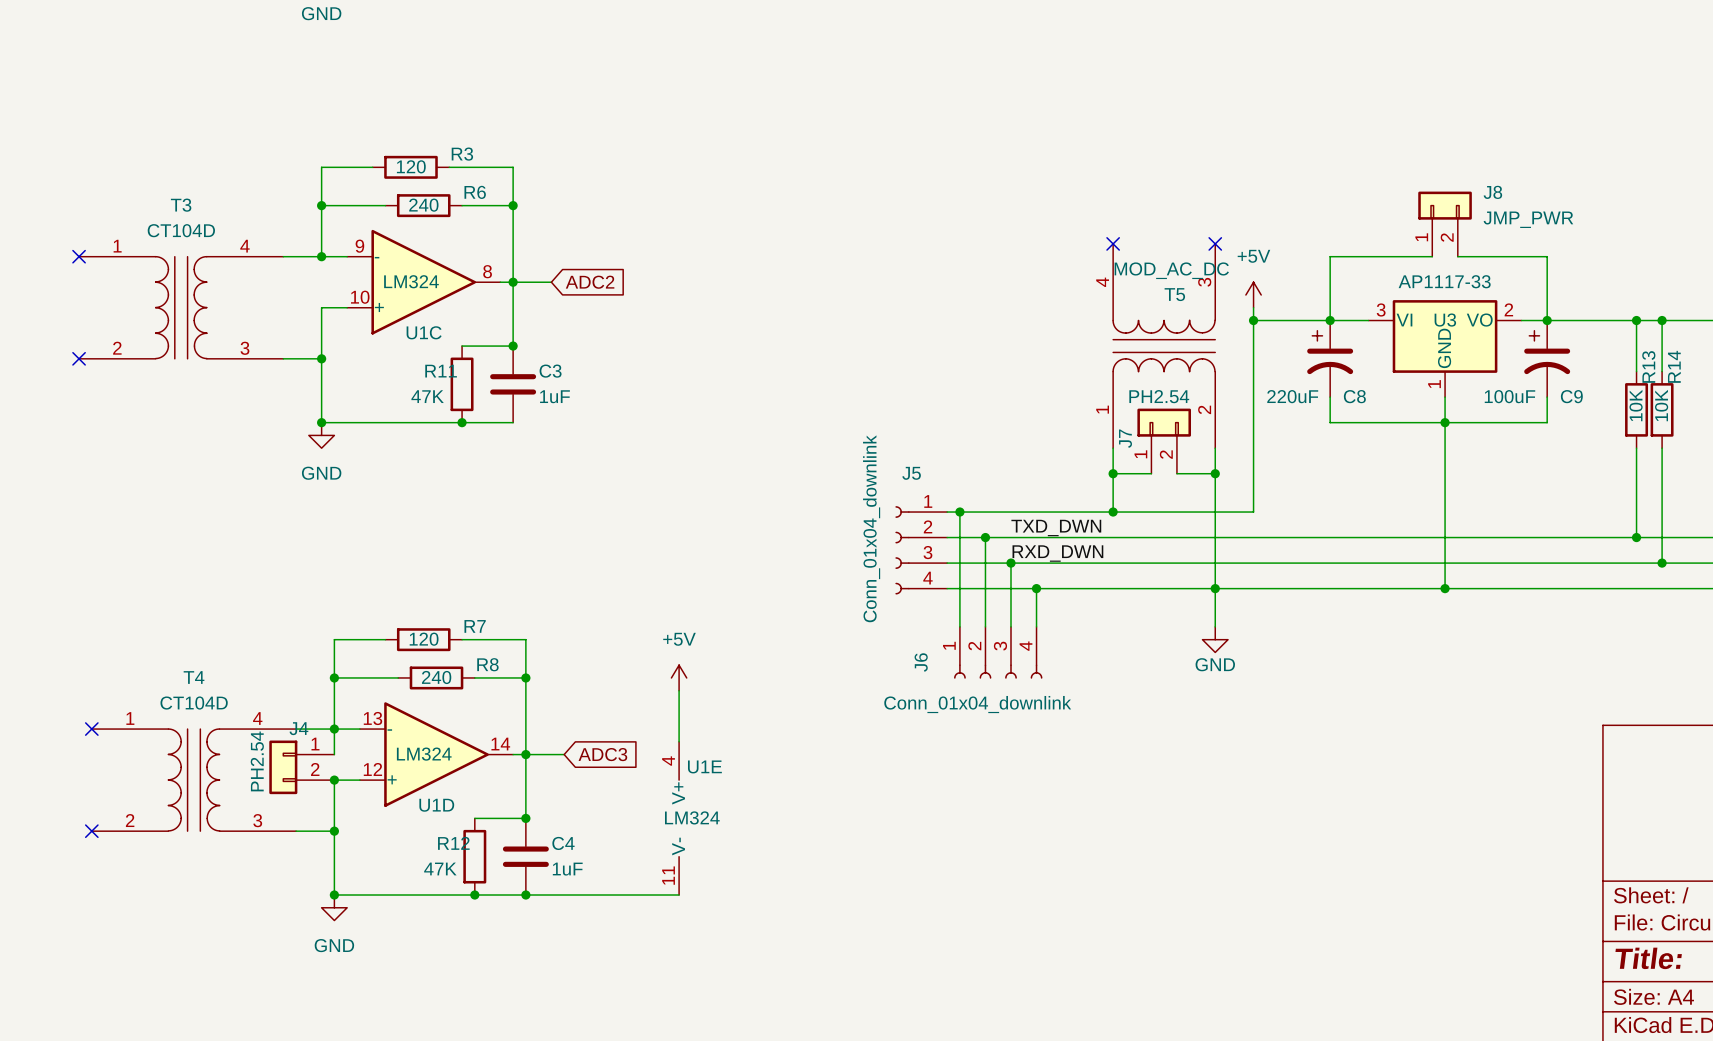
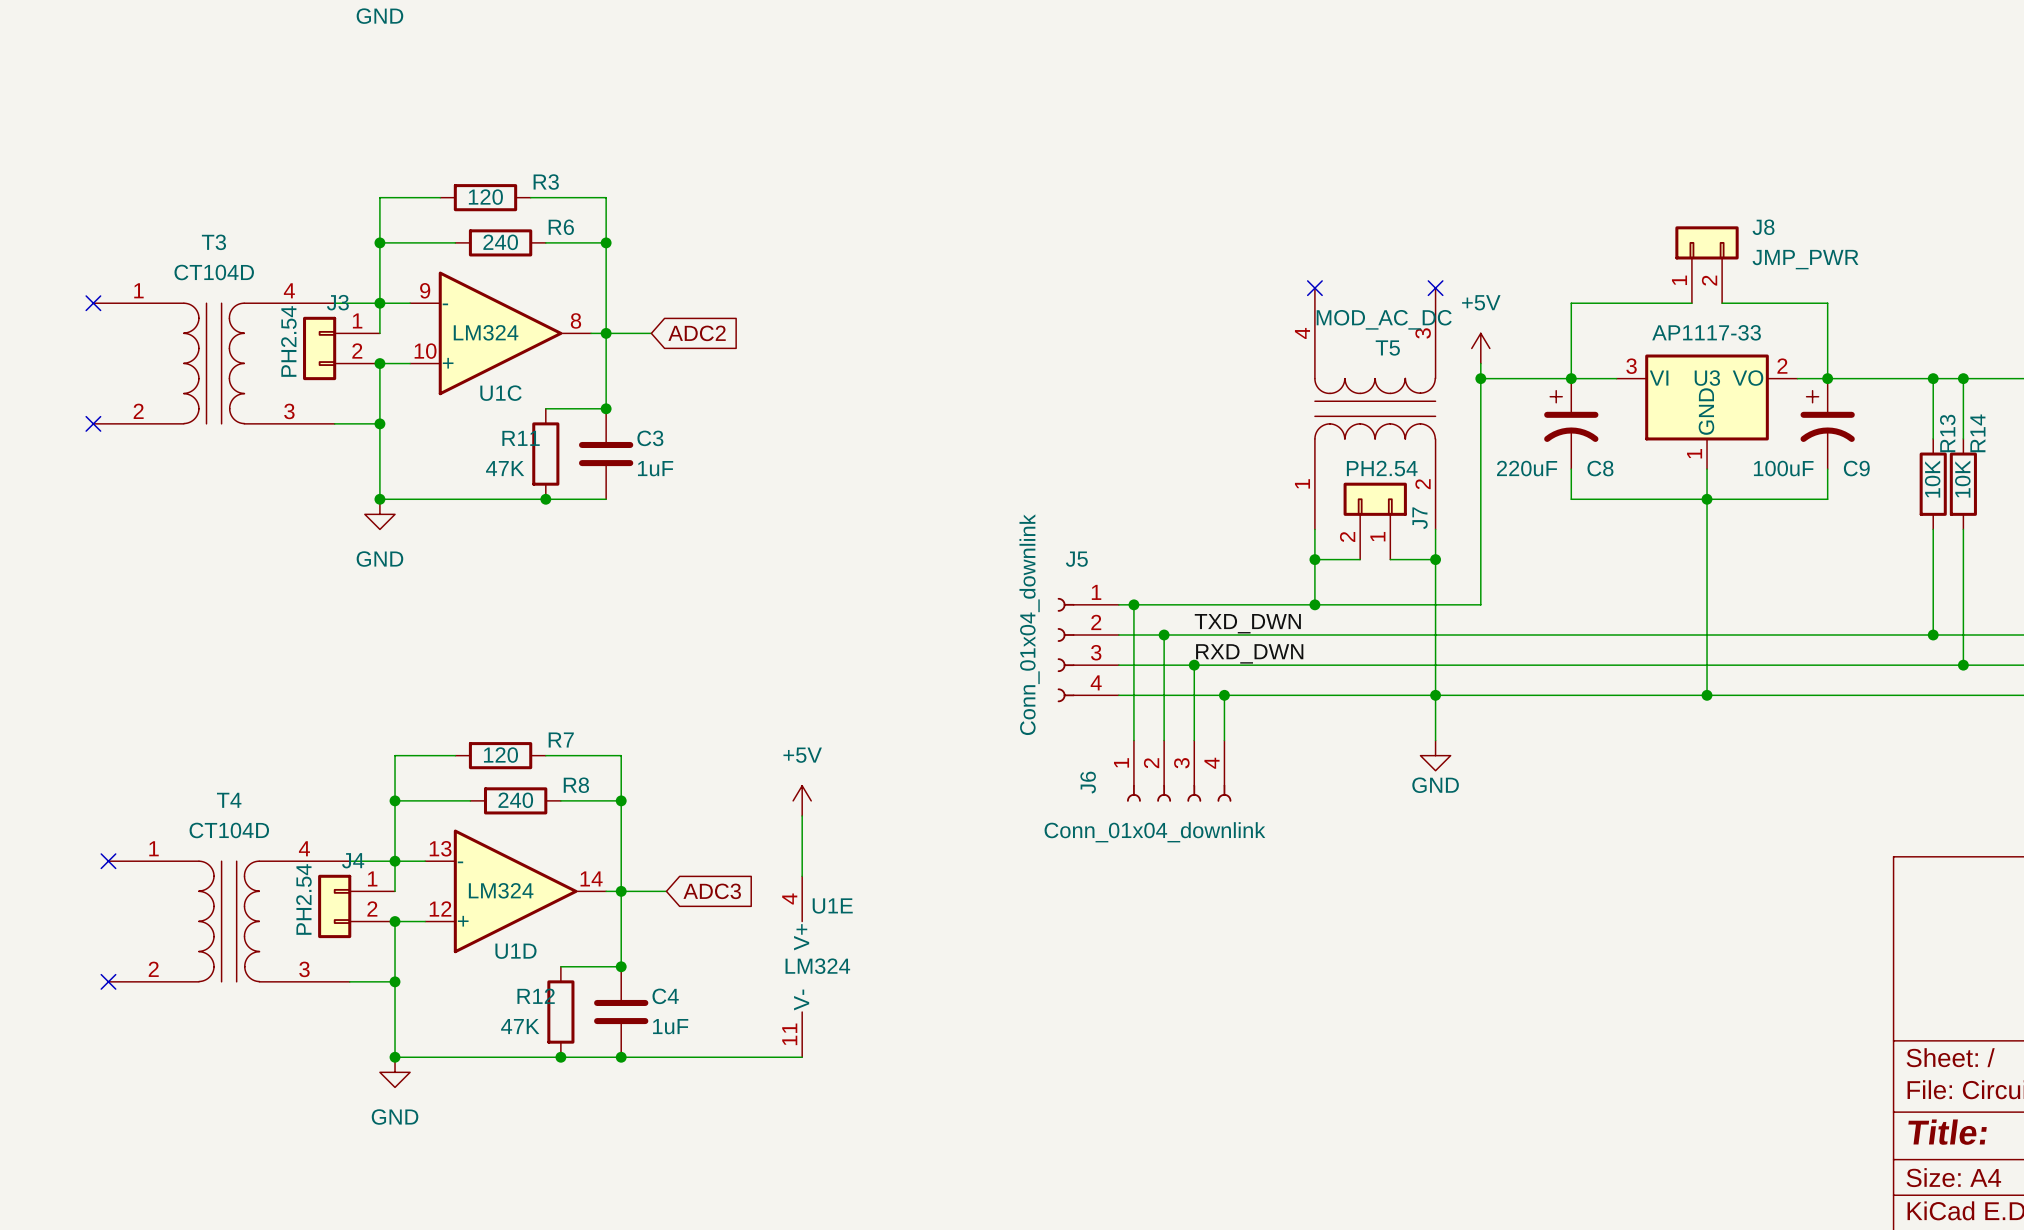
wire: none -> (379, 303) (379, 333)
J3: none -> PH2.54 (341, 348)
junction: none -> (379, 363)
J7 flip: as is (1164, 422) -> left-right (1375, 499)

